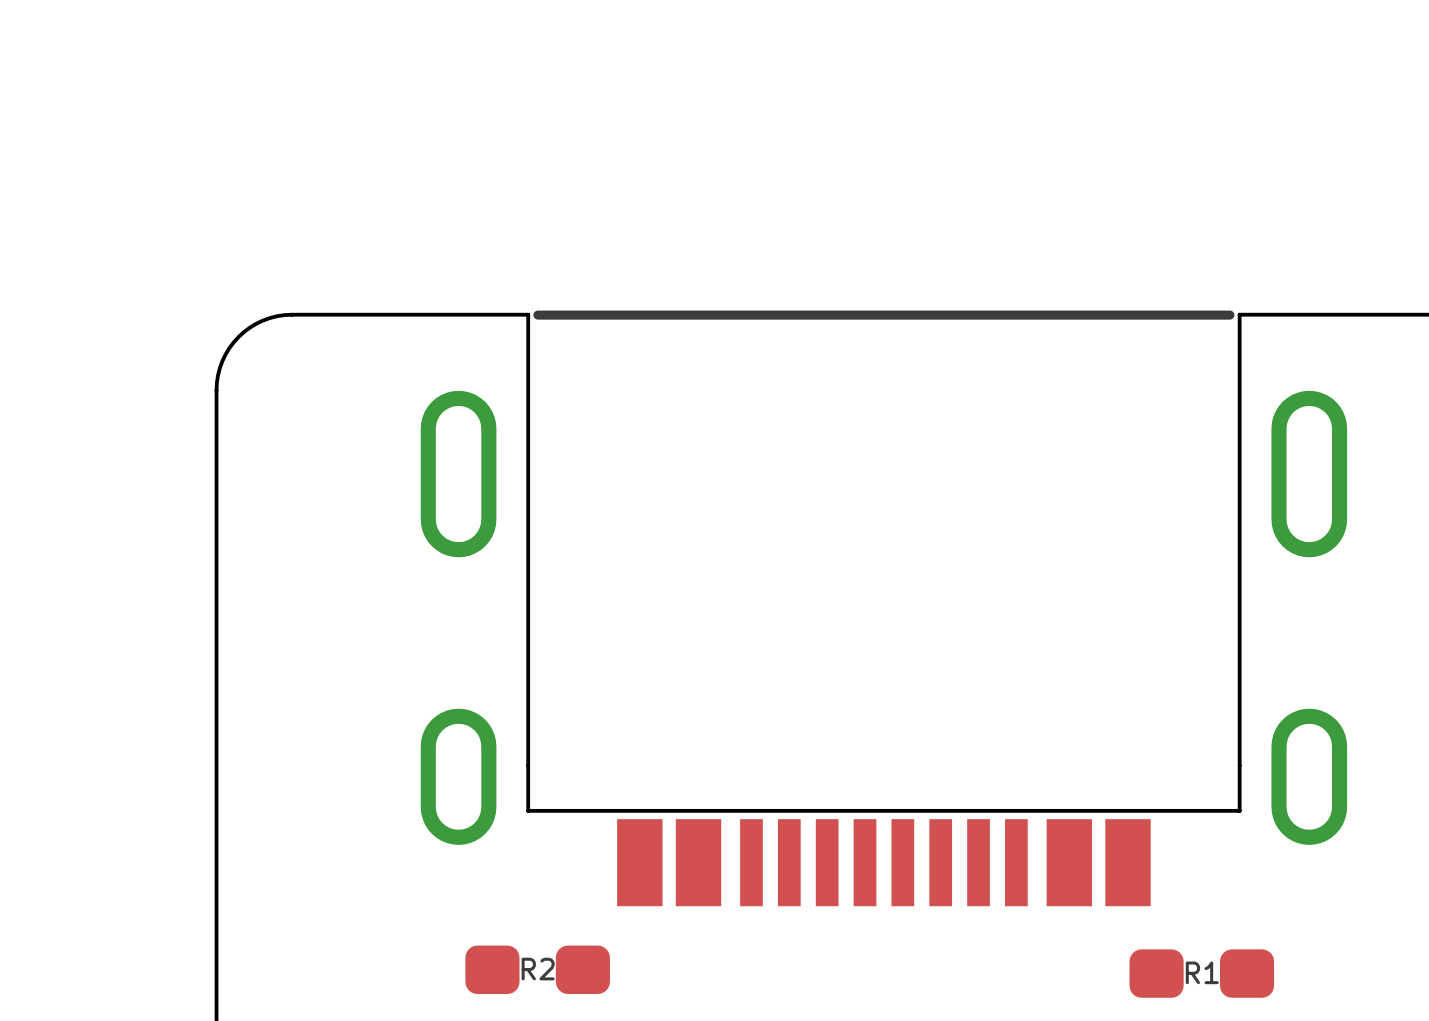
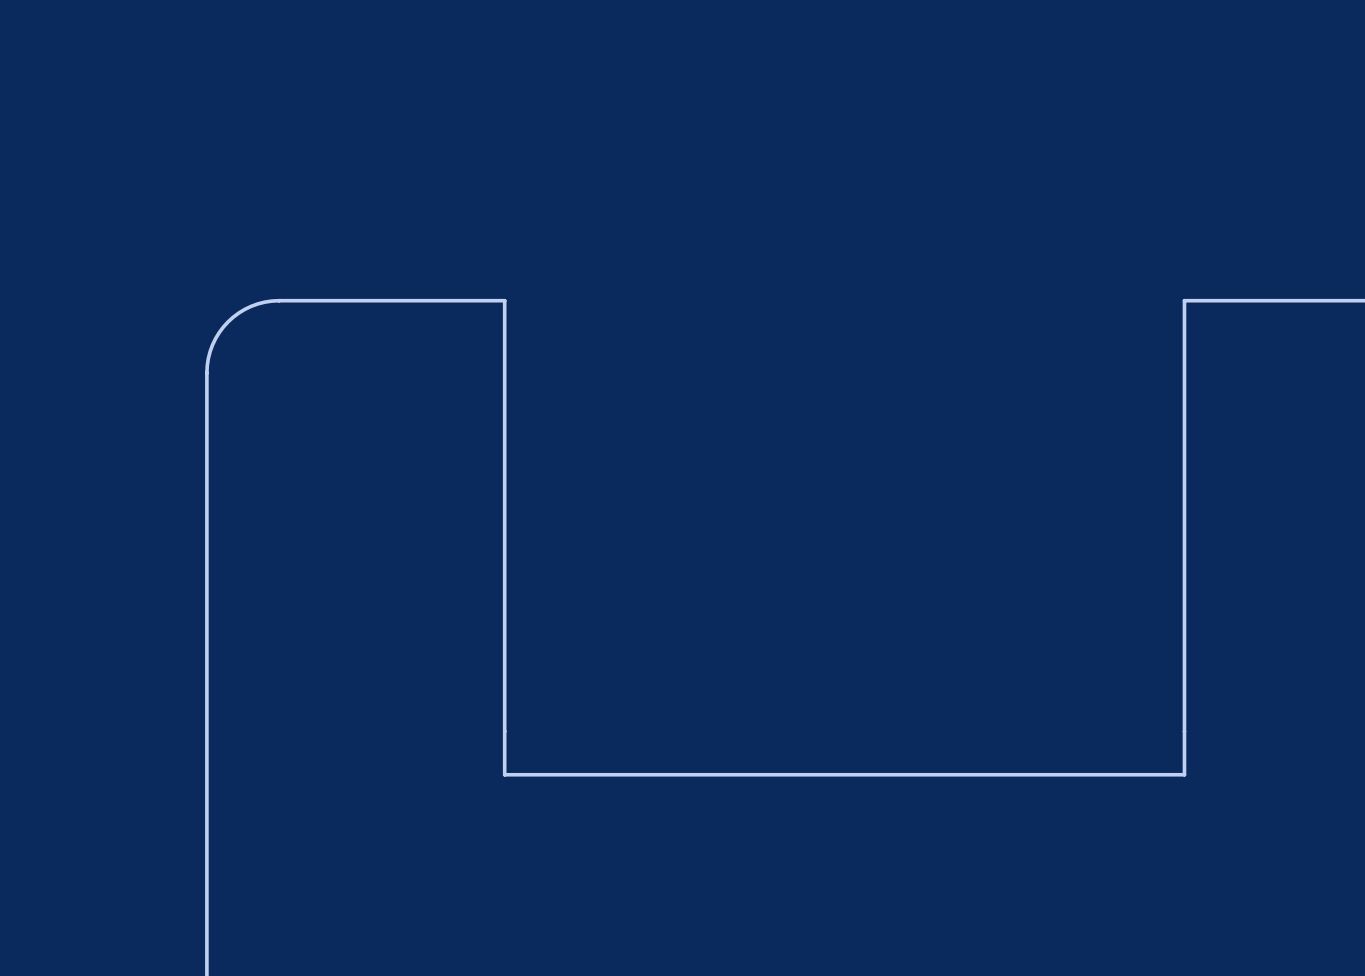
part: (883, 608) -> none
R2: (537, 969) -> none
R1: (1201, 973) -> none

